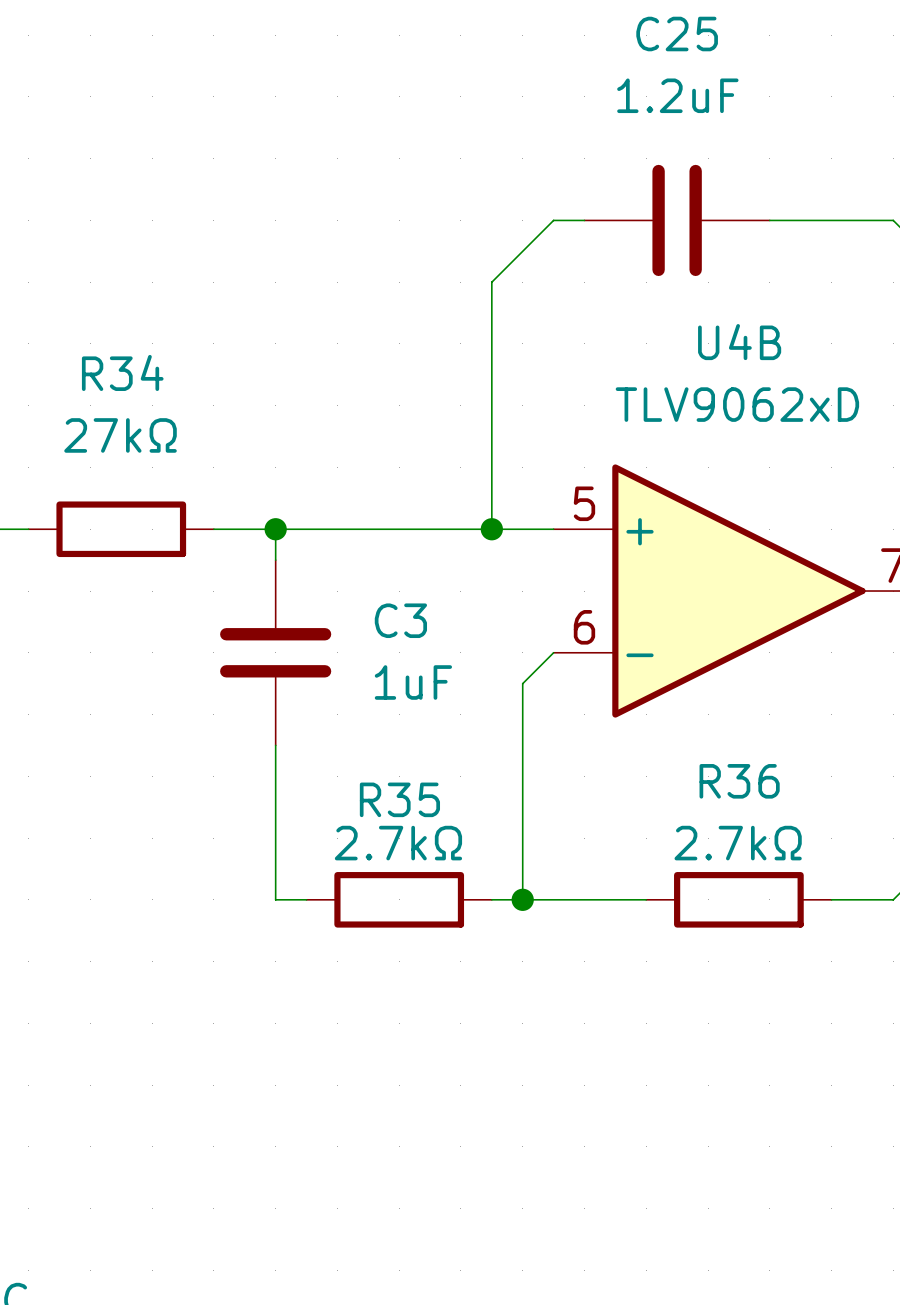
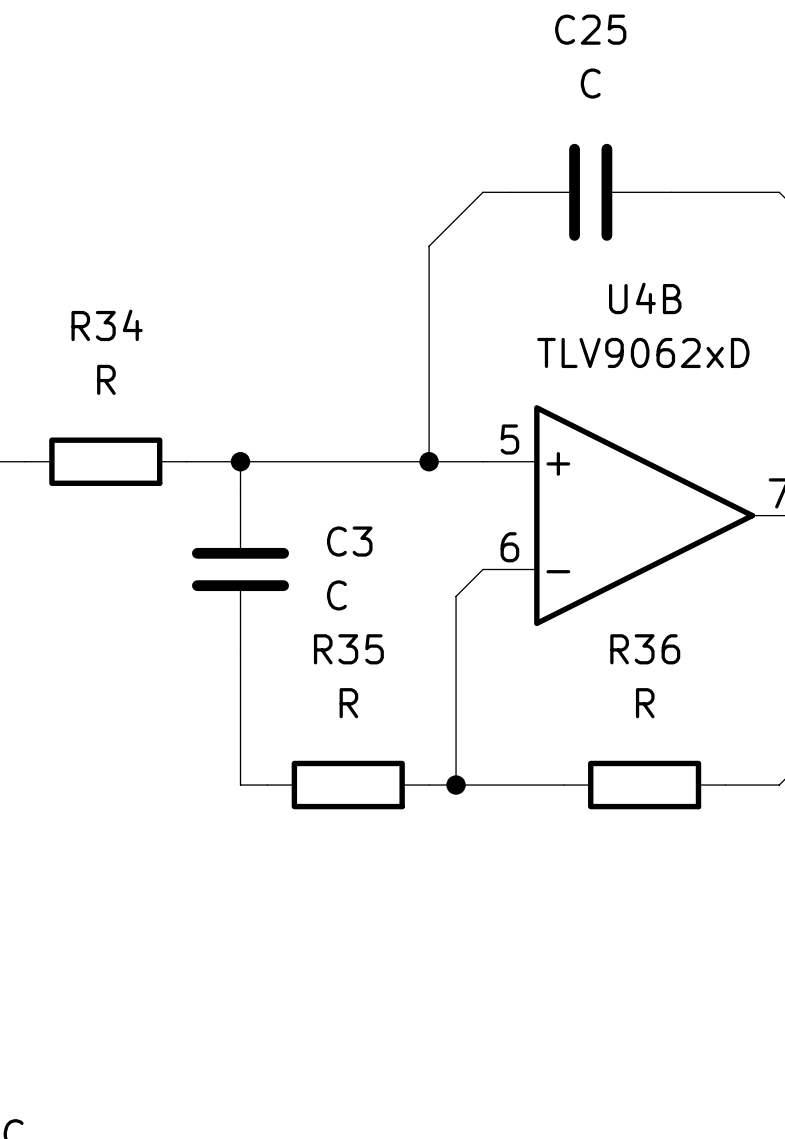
C25 value: 1.2uF (677, 95) -> C (590, 83)
R34 value: 27kΩ (120, 435) -> R (106, 379)
C3 value: 1uF (413, 682) -> C (336, 595)
R36 name position: R36 (739, 781) -> R36 (645, 649)
R35 name position: R35 (399, 799) -> R35 (348, 649)
R35 value: 2.7kΩ (398, 843) -> R (348, 703)
R36 value: 2.7kΩ (738, 843) -> R (645, 703)

